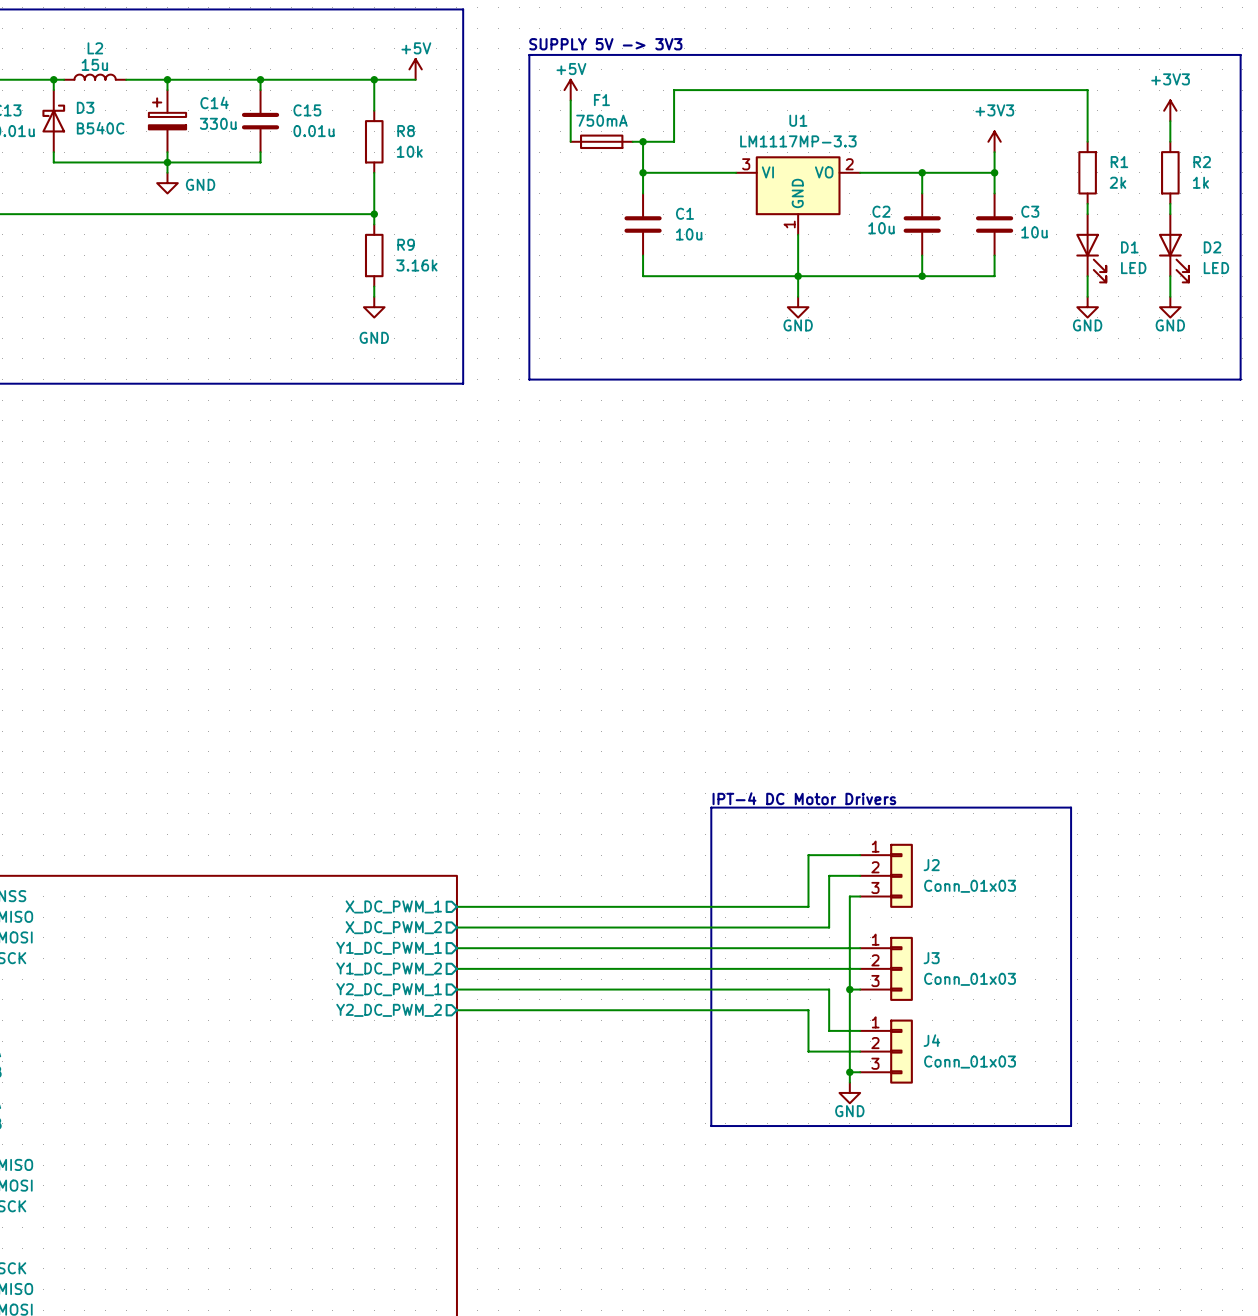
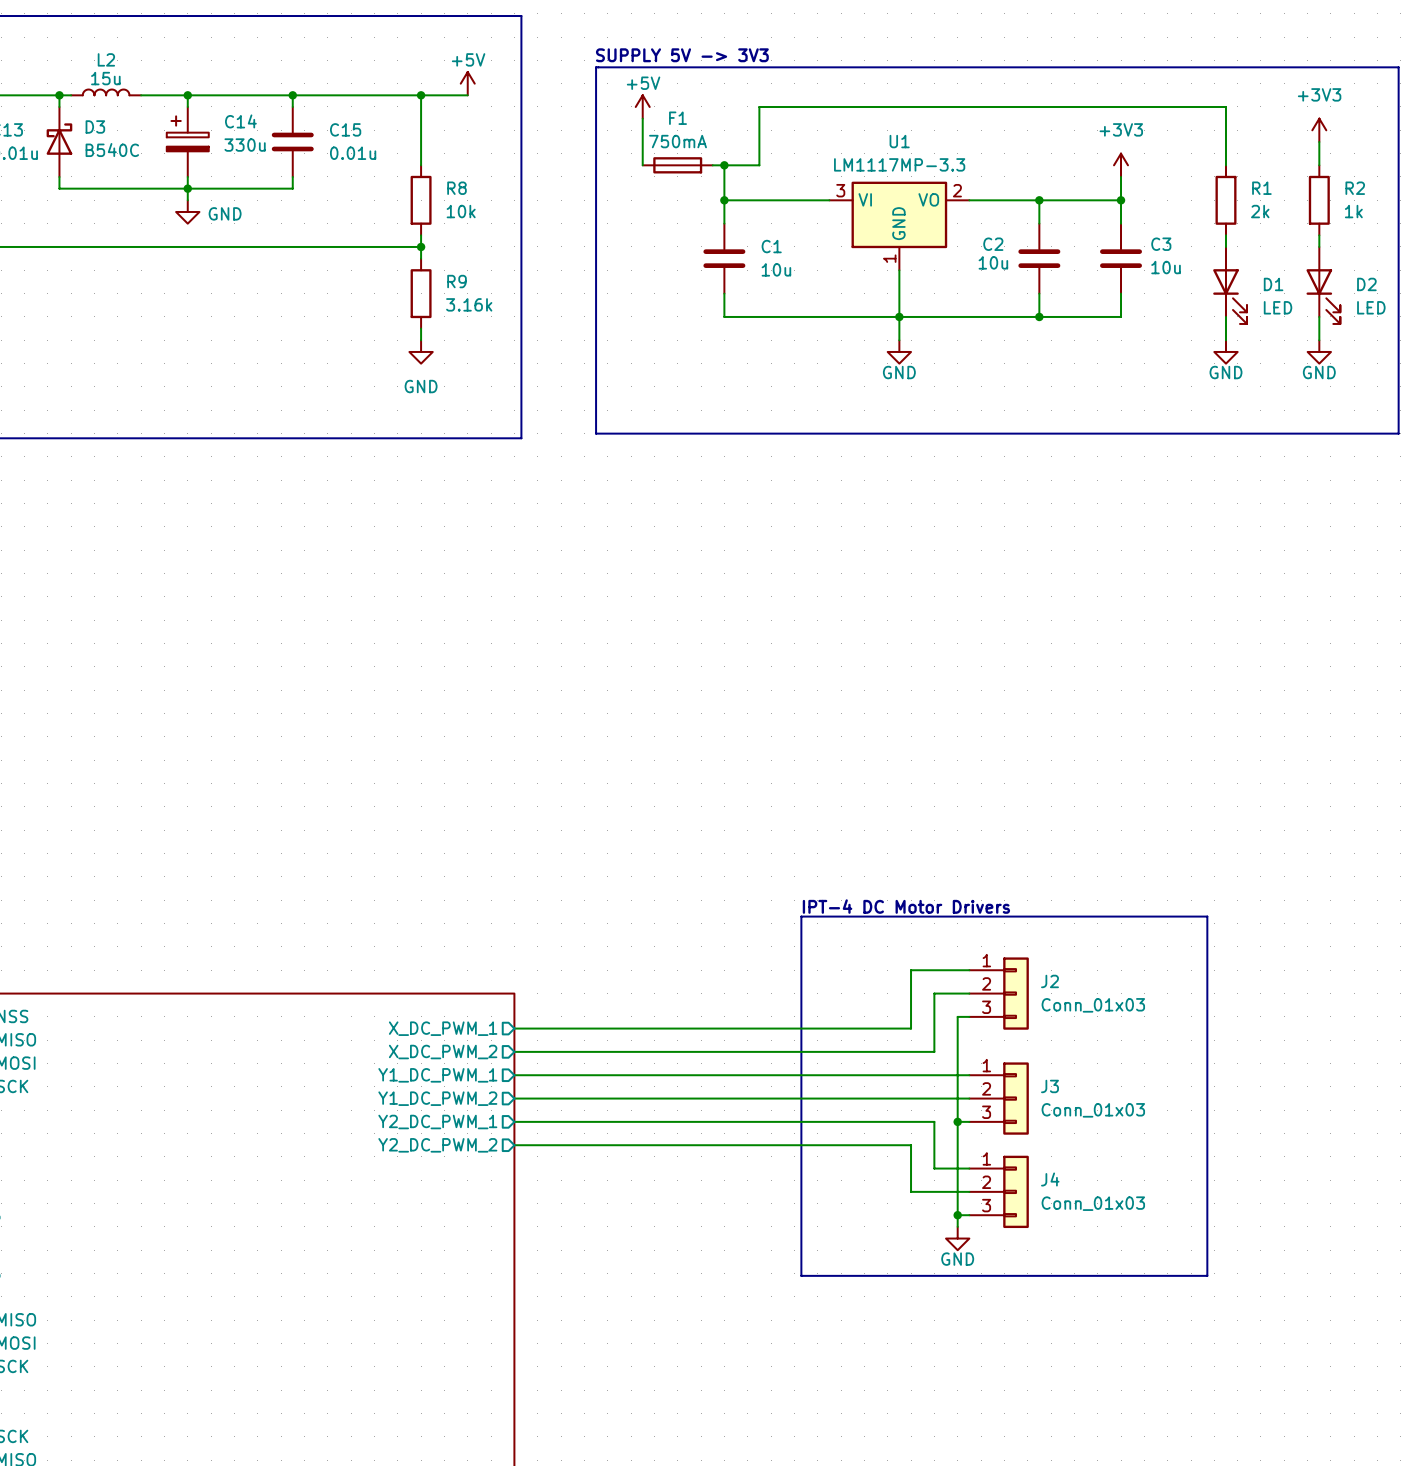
R8 position: (374, 141) -> (421, 200)
wire: (374, 172) (374, 203) -> (421, 130) (421, 165)

